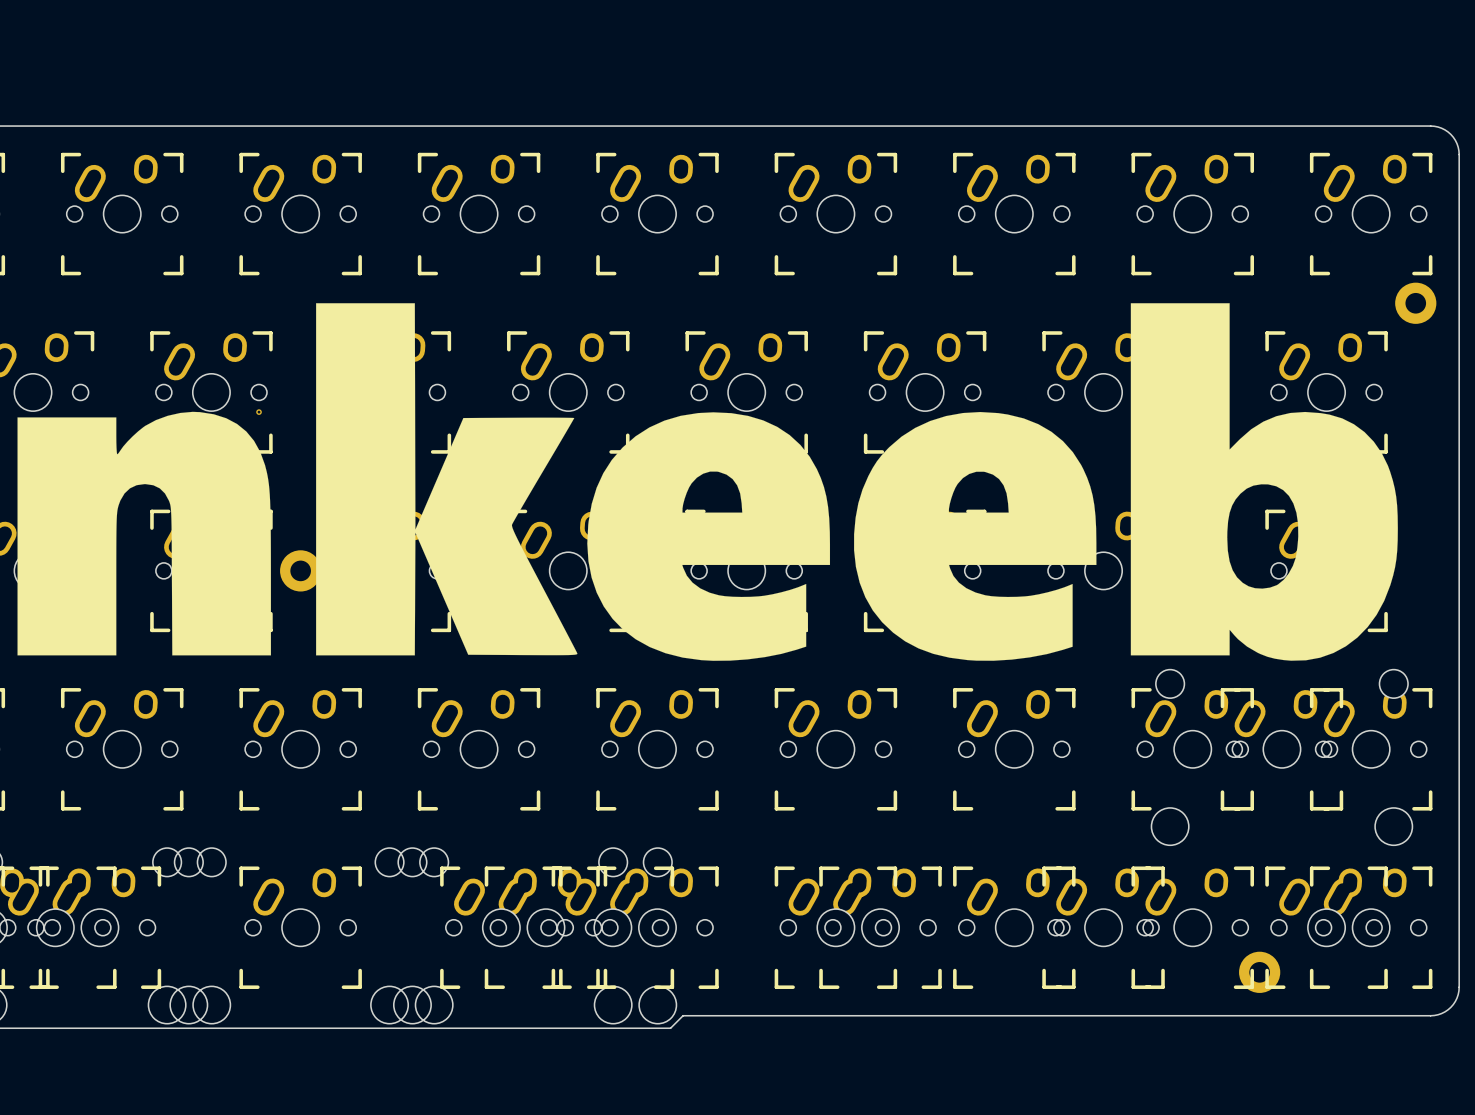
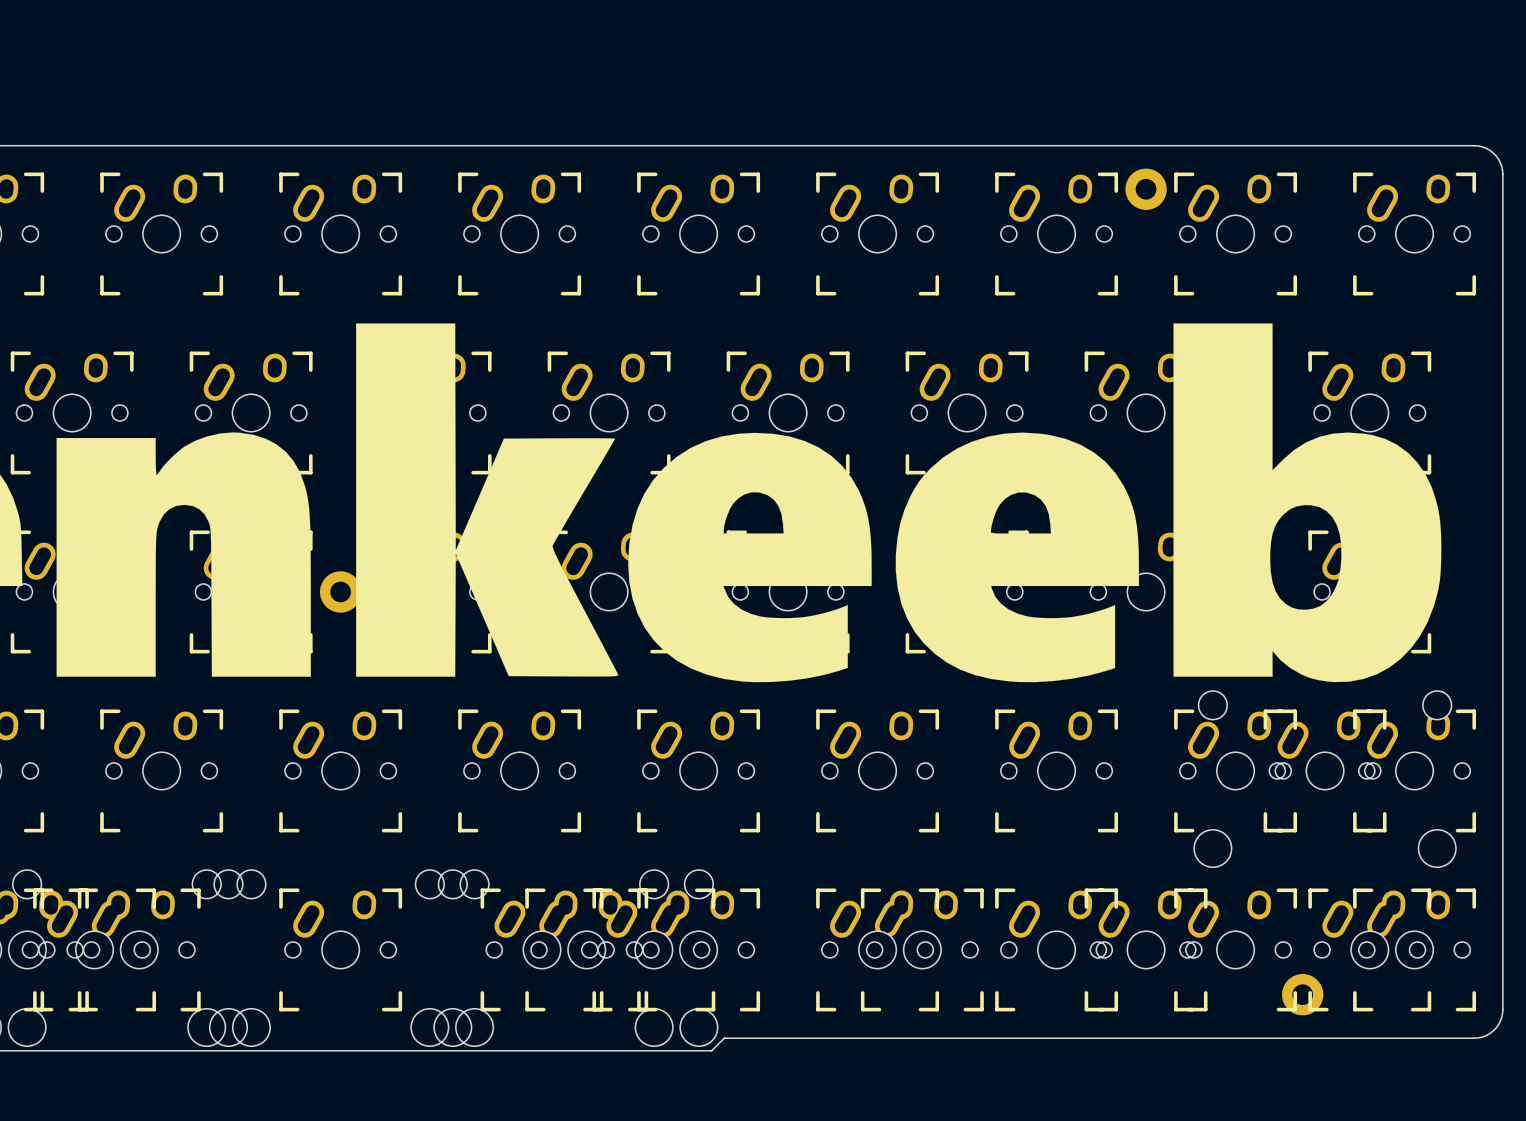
part: none -> (1146, 189)
part: (1415, 303) -> none
part: (259, 412) -> none

